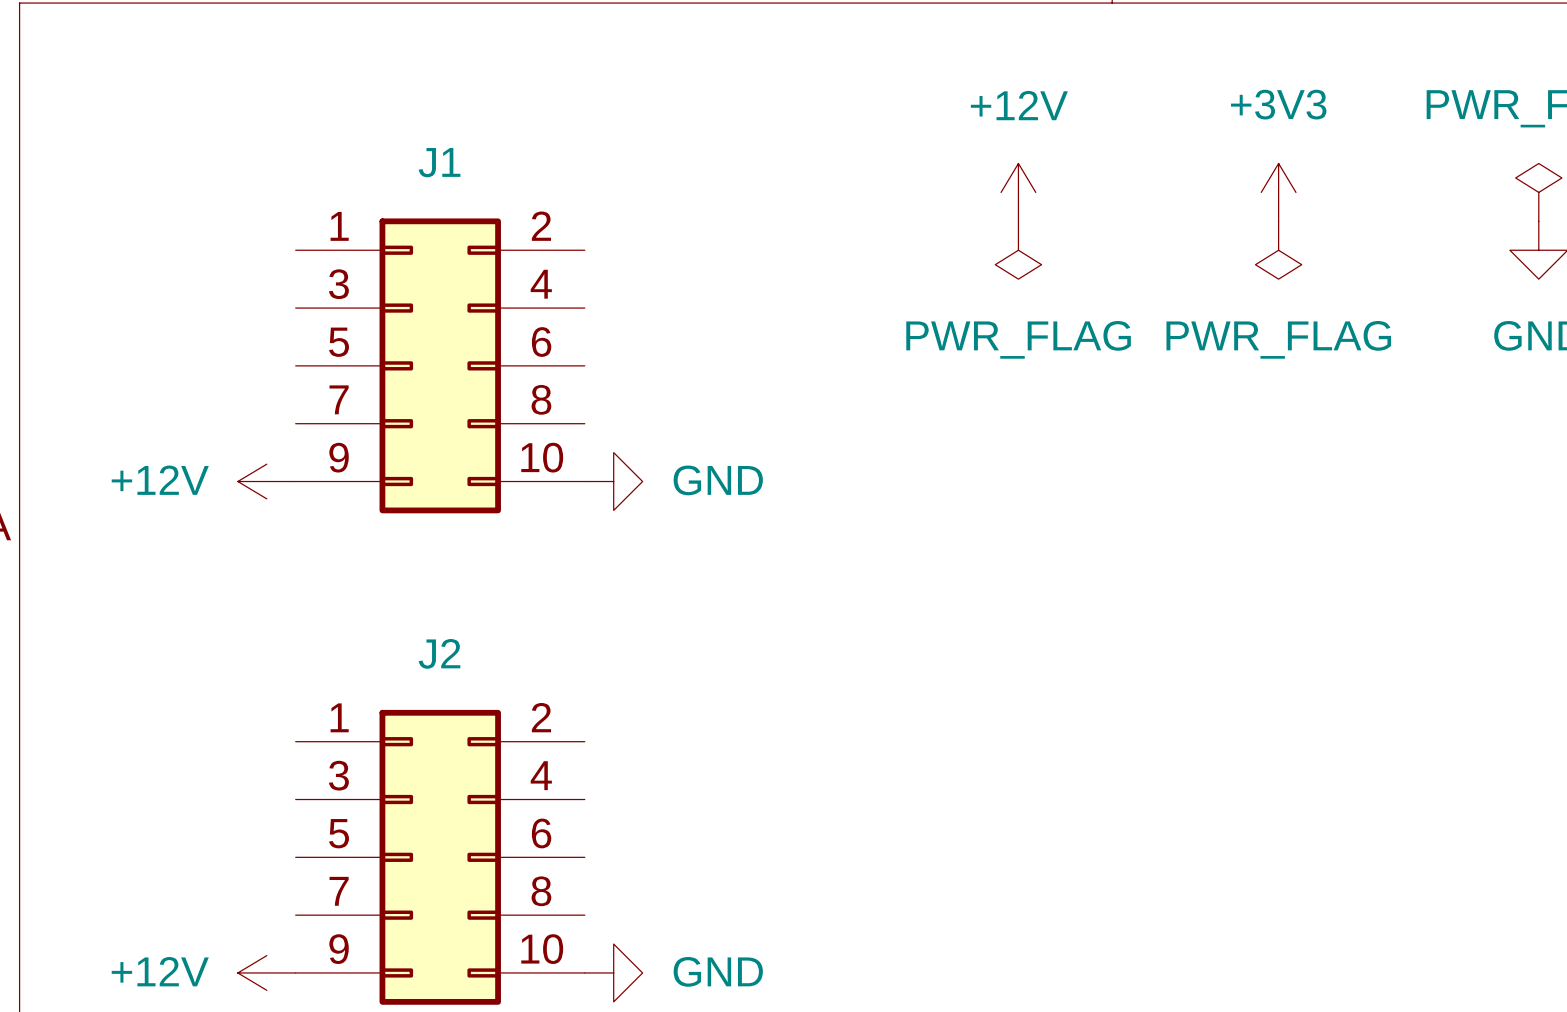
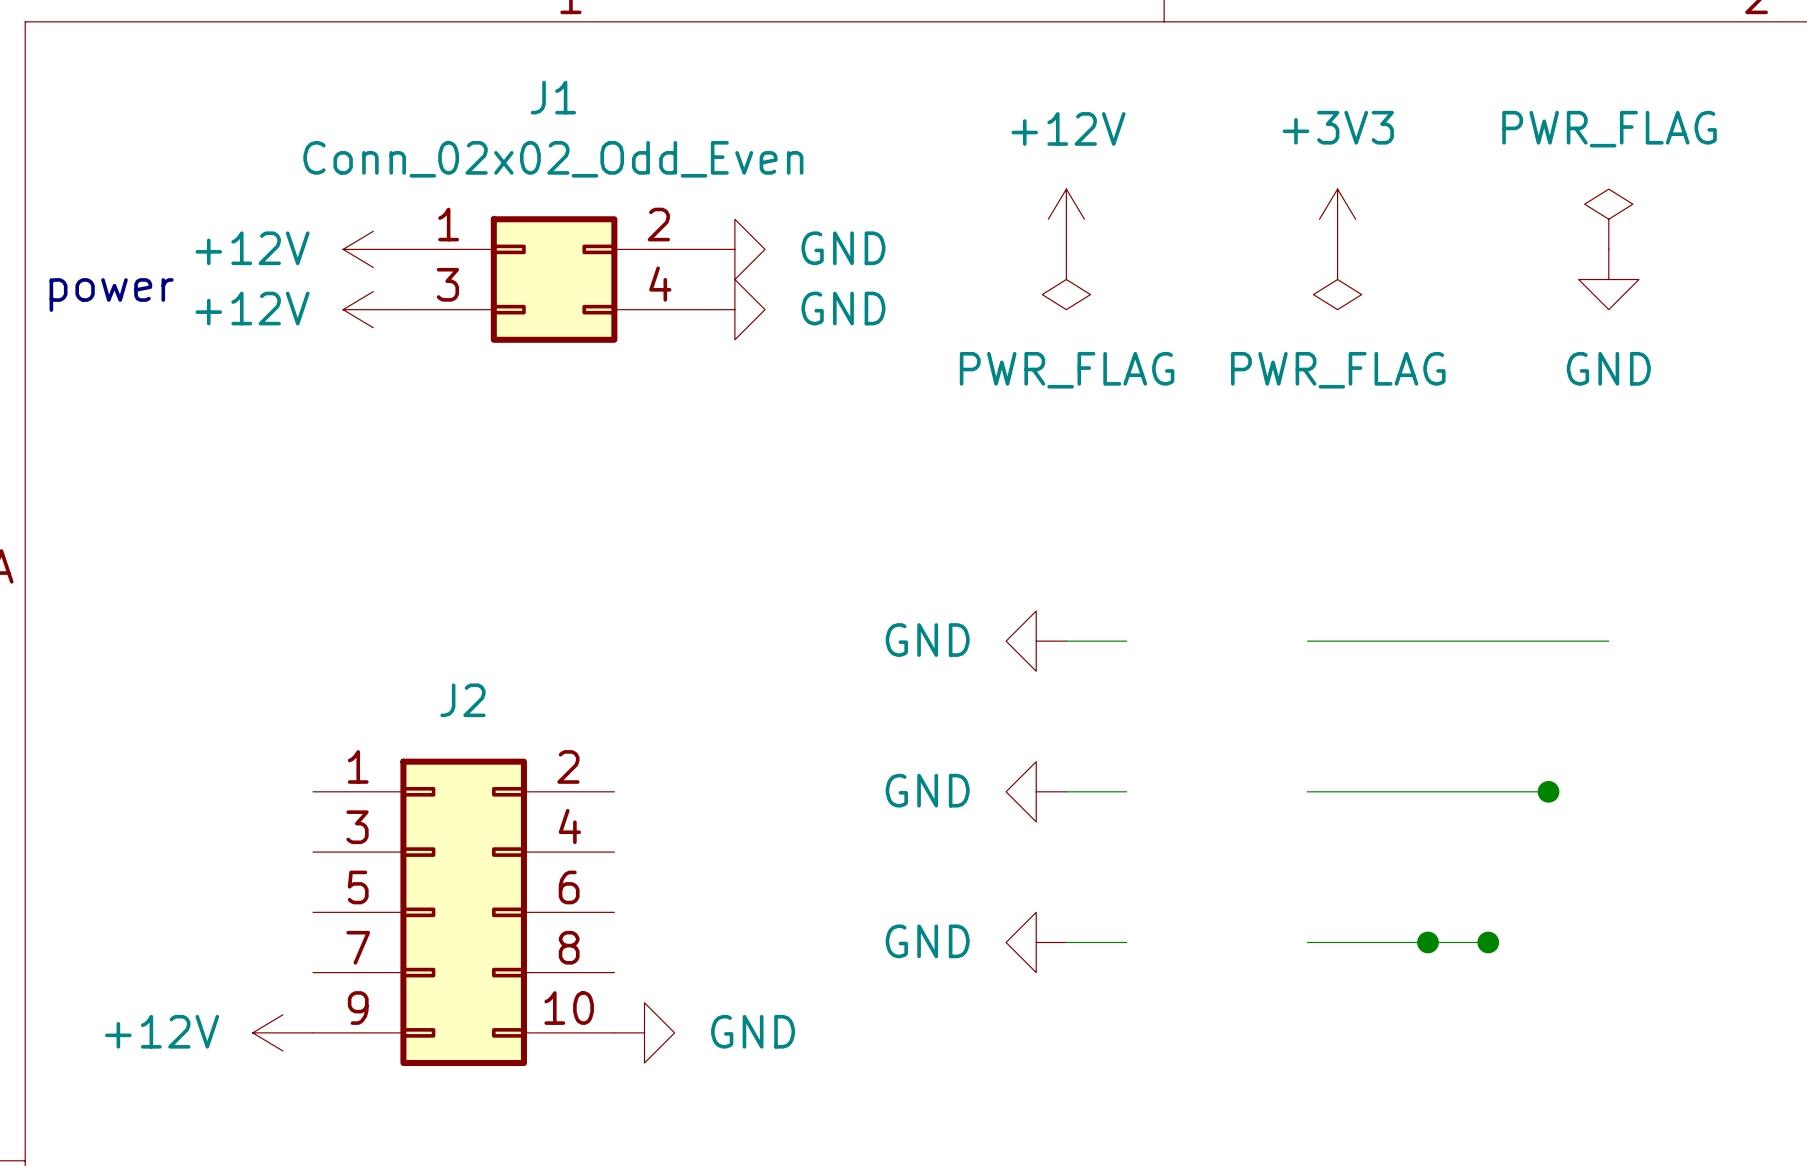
J1 value: none -> Conn_02x02_Odd_Even (553, 159)
J1 symbol: [295, 218, 585, 514] -> [403, 216, 705, 343]
power symbol: none -> +12V (373, 249)
power symbol: none -> GND (734, 249)
text: none -> power (111, 295)
power symbol: none -> +12V (373, 309)
power symbol: none -> GND (734, 309)
power symbol: +12V (266, 481) -> none
power symbol: GND (613, 481) -> none
power symbol: none -> GND (1036, 641)
wire: none -> (1066, 641) (1126, 641)
wire: none -> (1307, 641) (1608, 641)
power symbol: none -> GND (1036, 791)
wire: none -> (1066, 791) (1126, 791)
wire: none -> (1307, 791) (1548, 791)
junction: none -> (1548, 791)
power symbol: none -> GND (1036, 942)
wire: none -> (1066, 942) (1126, 942)
wire: none -> (1307, 942) (1488, 942)
junction: none -> (1427, 942)
junction: none -> (1488, 942)

